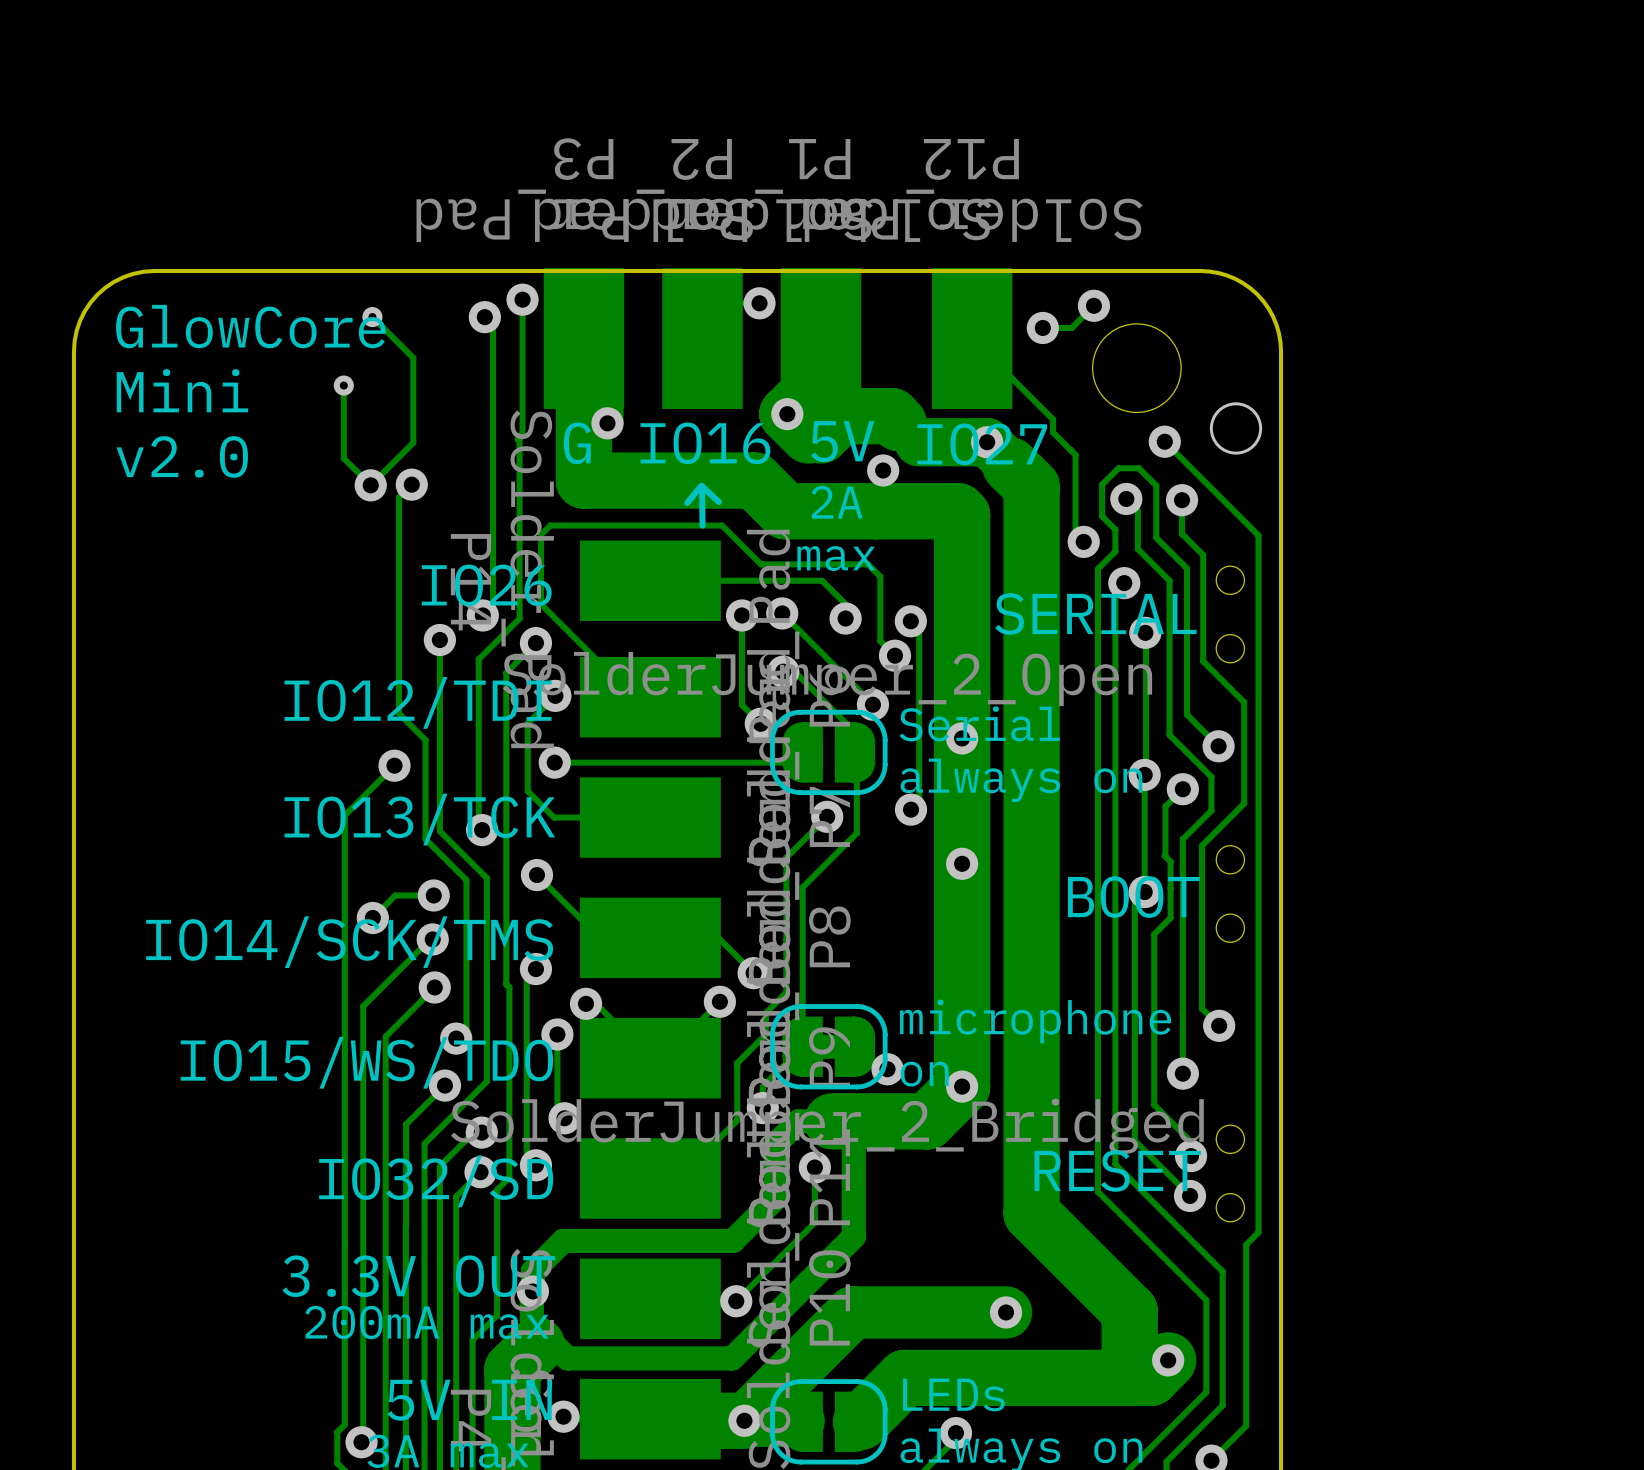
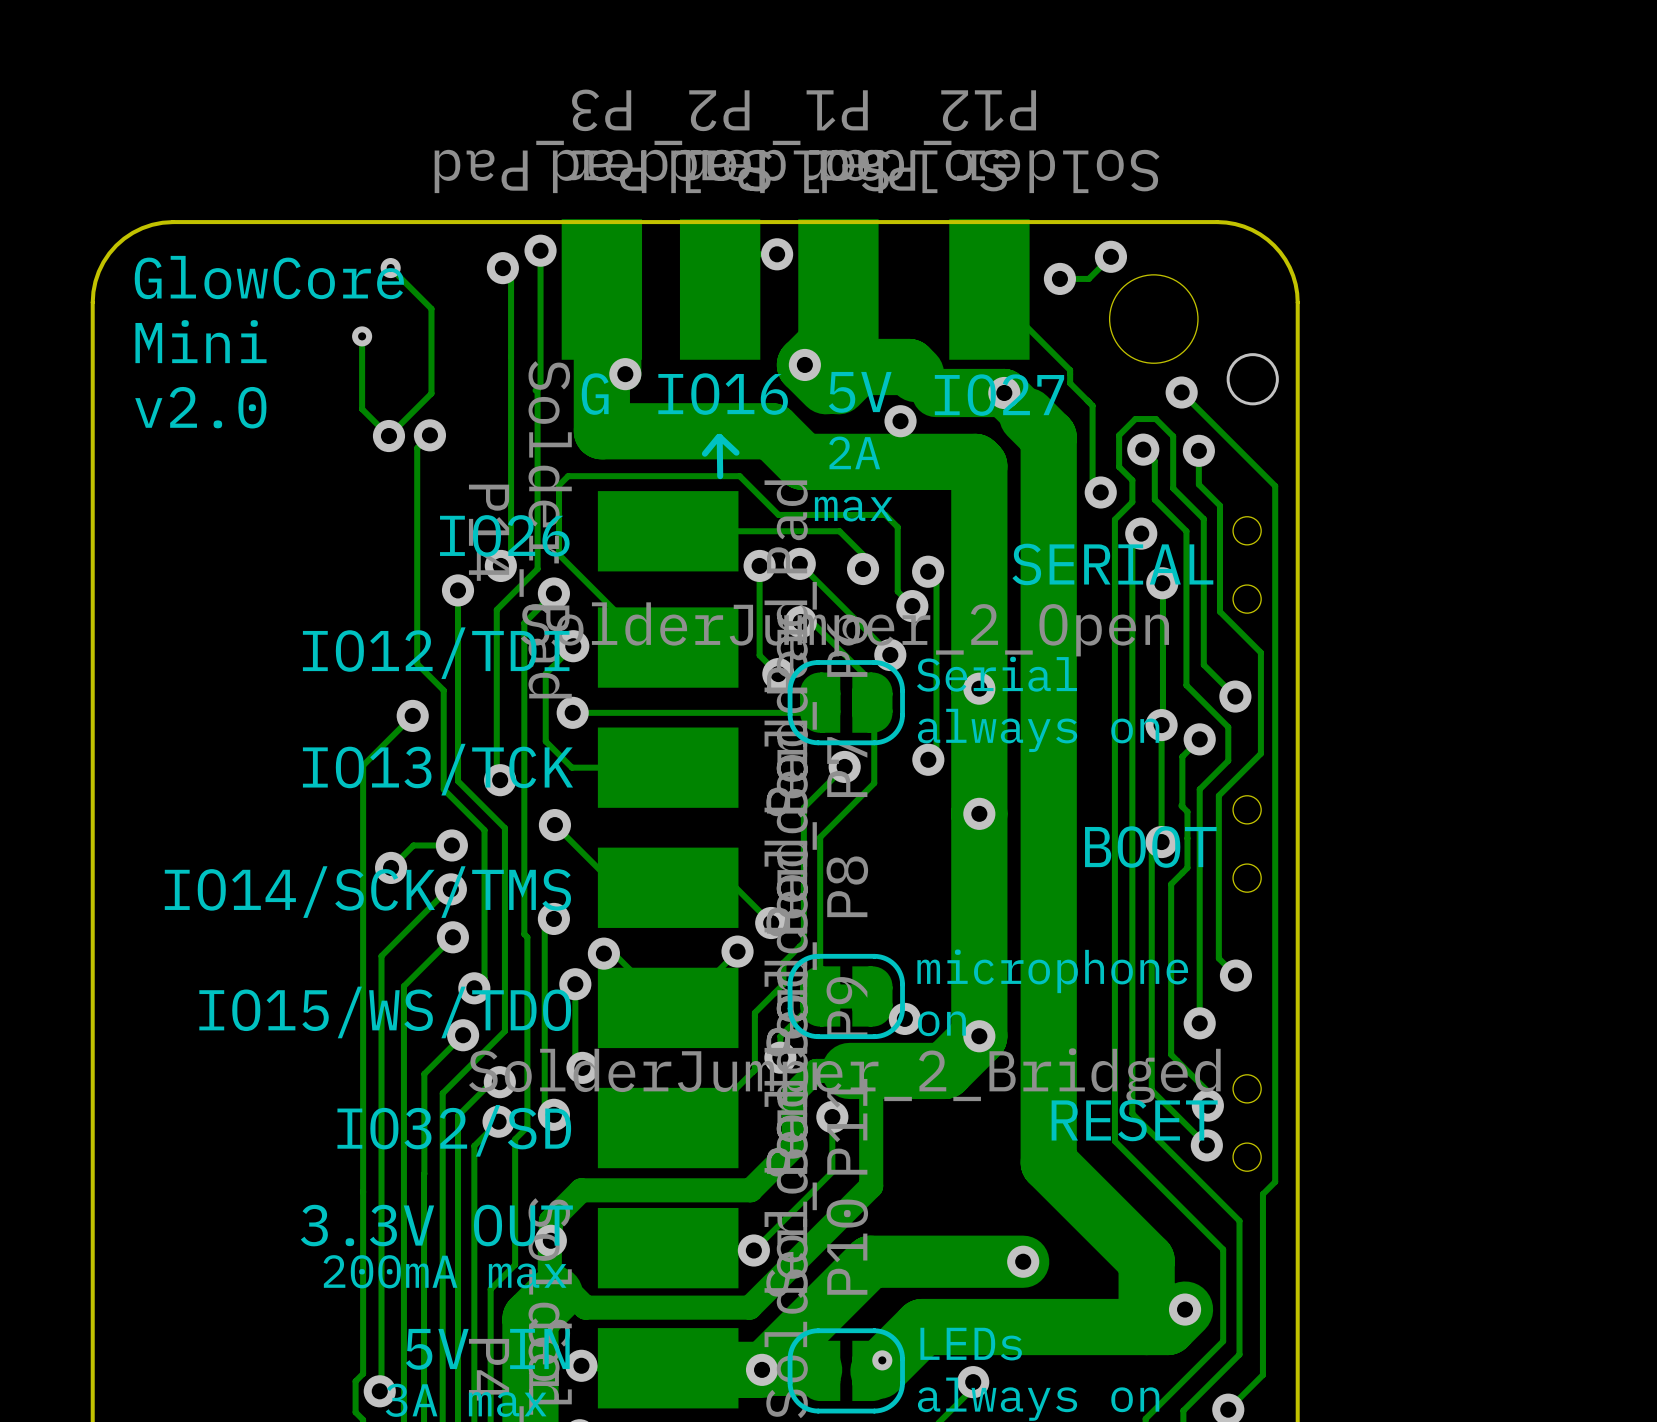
via: none -> (882, 1360)

